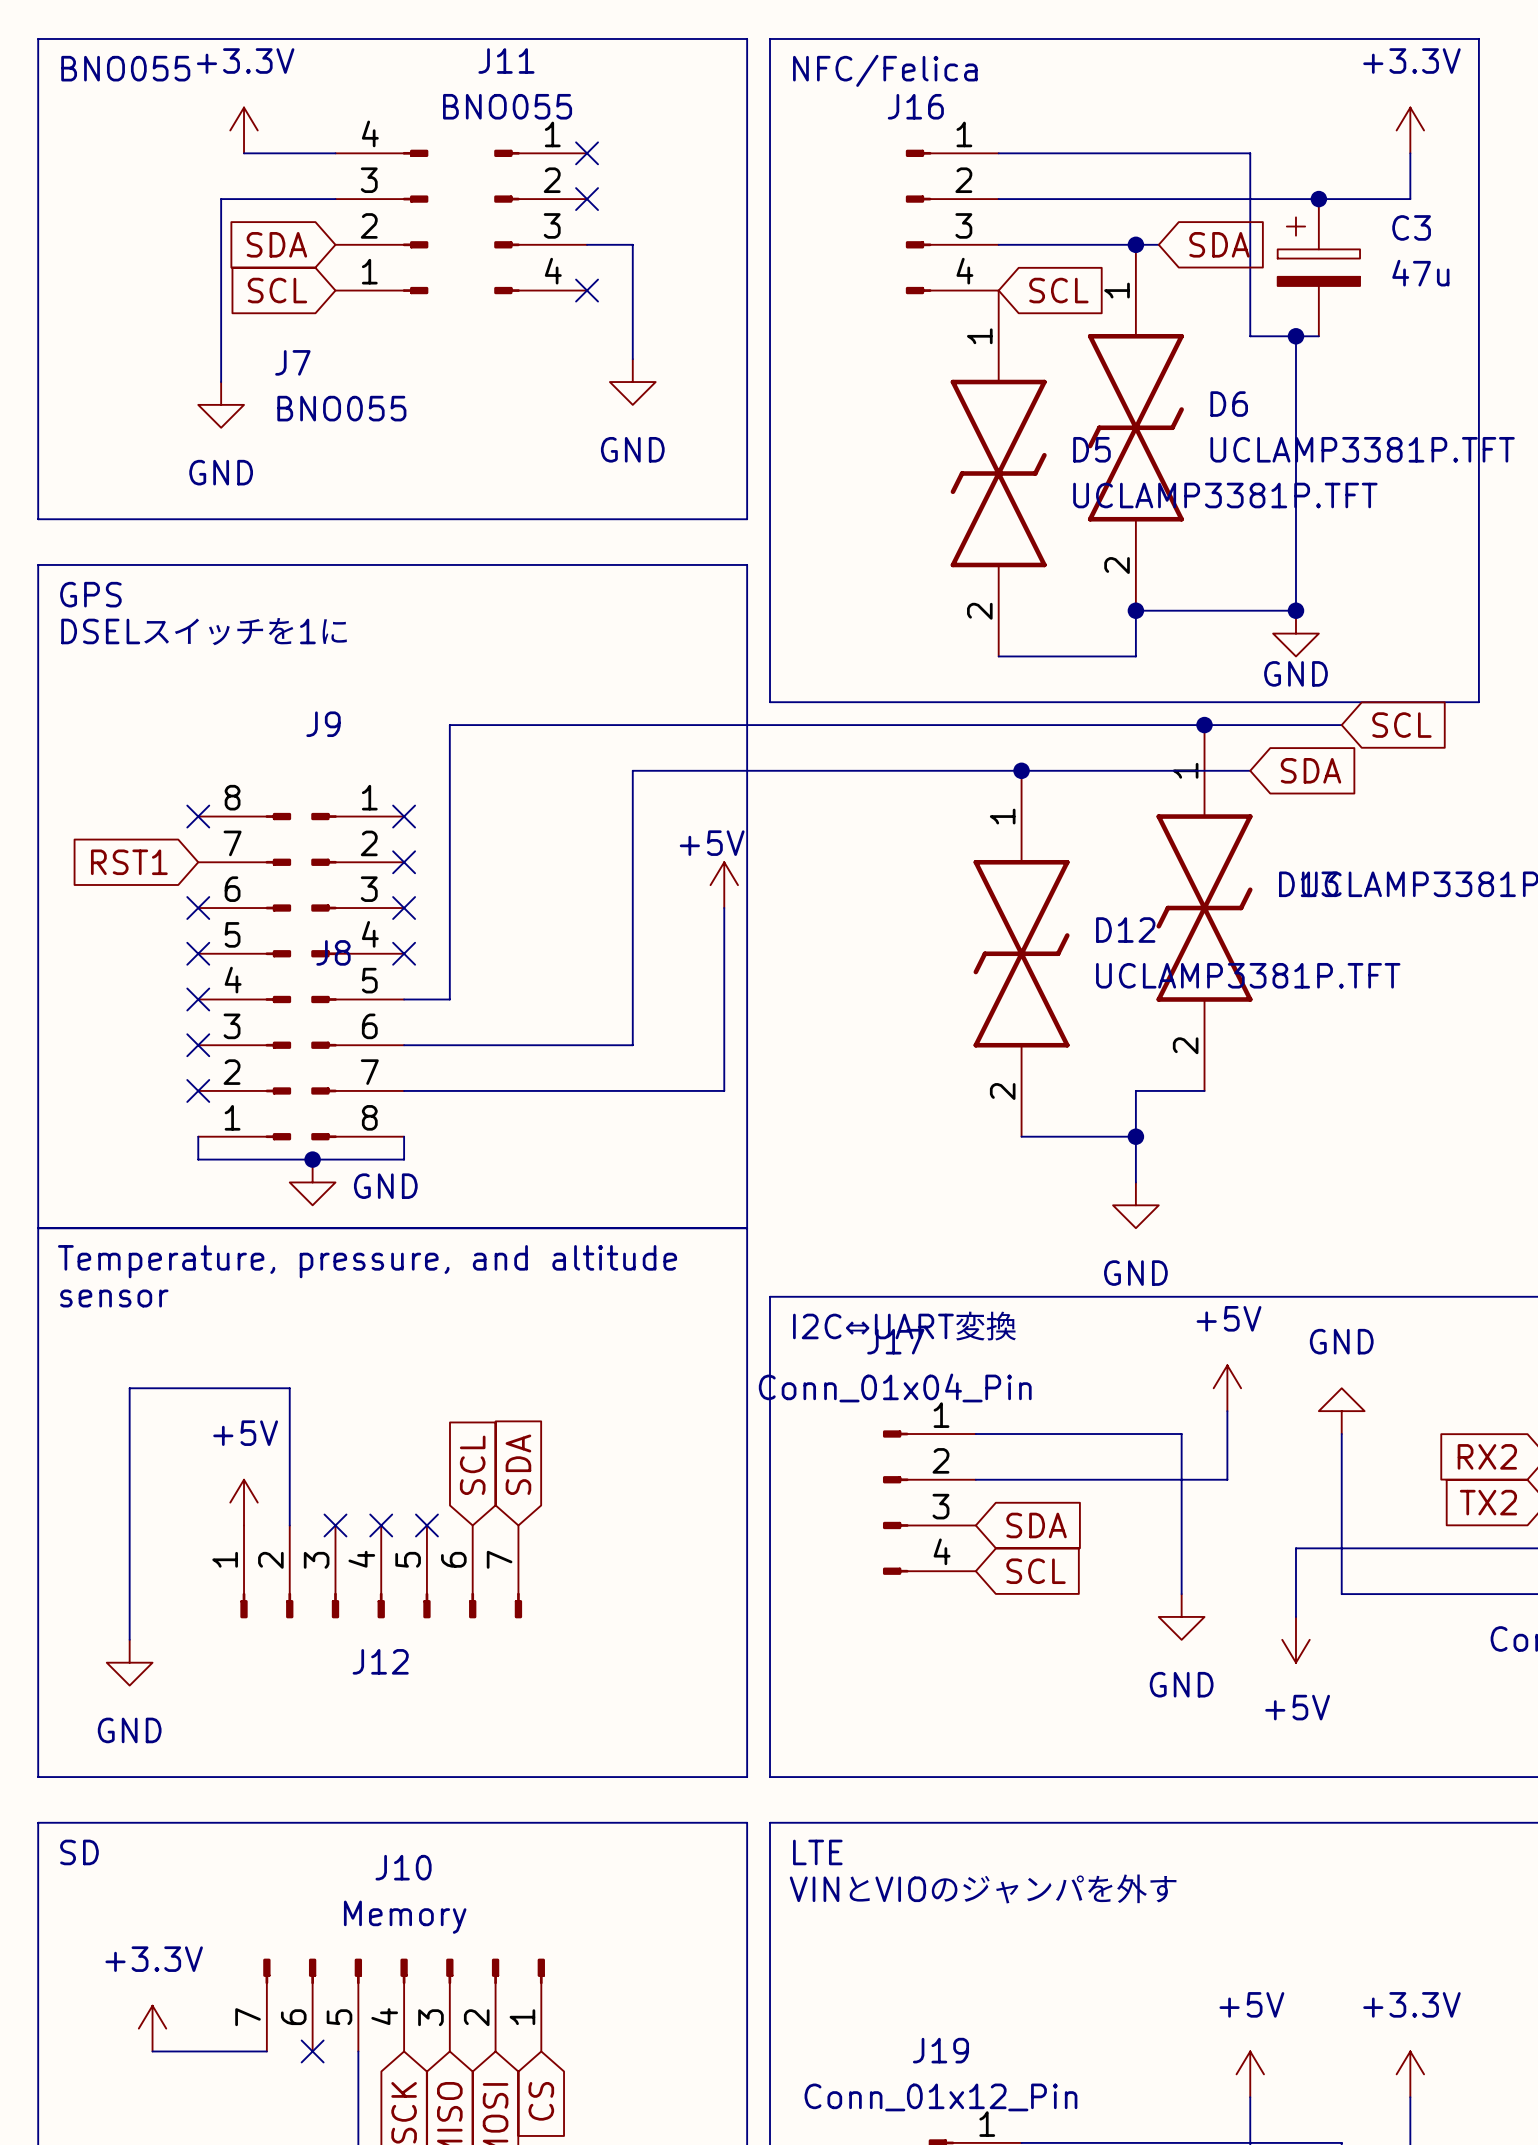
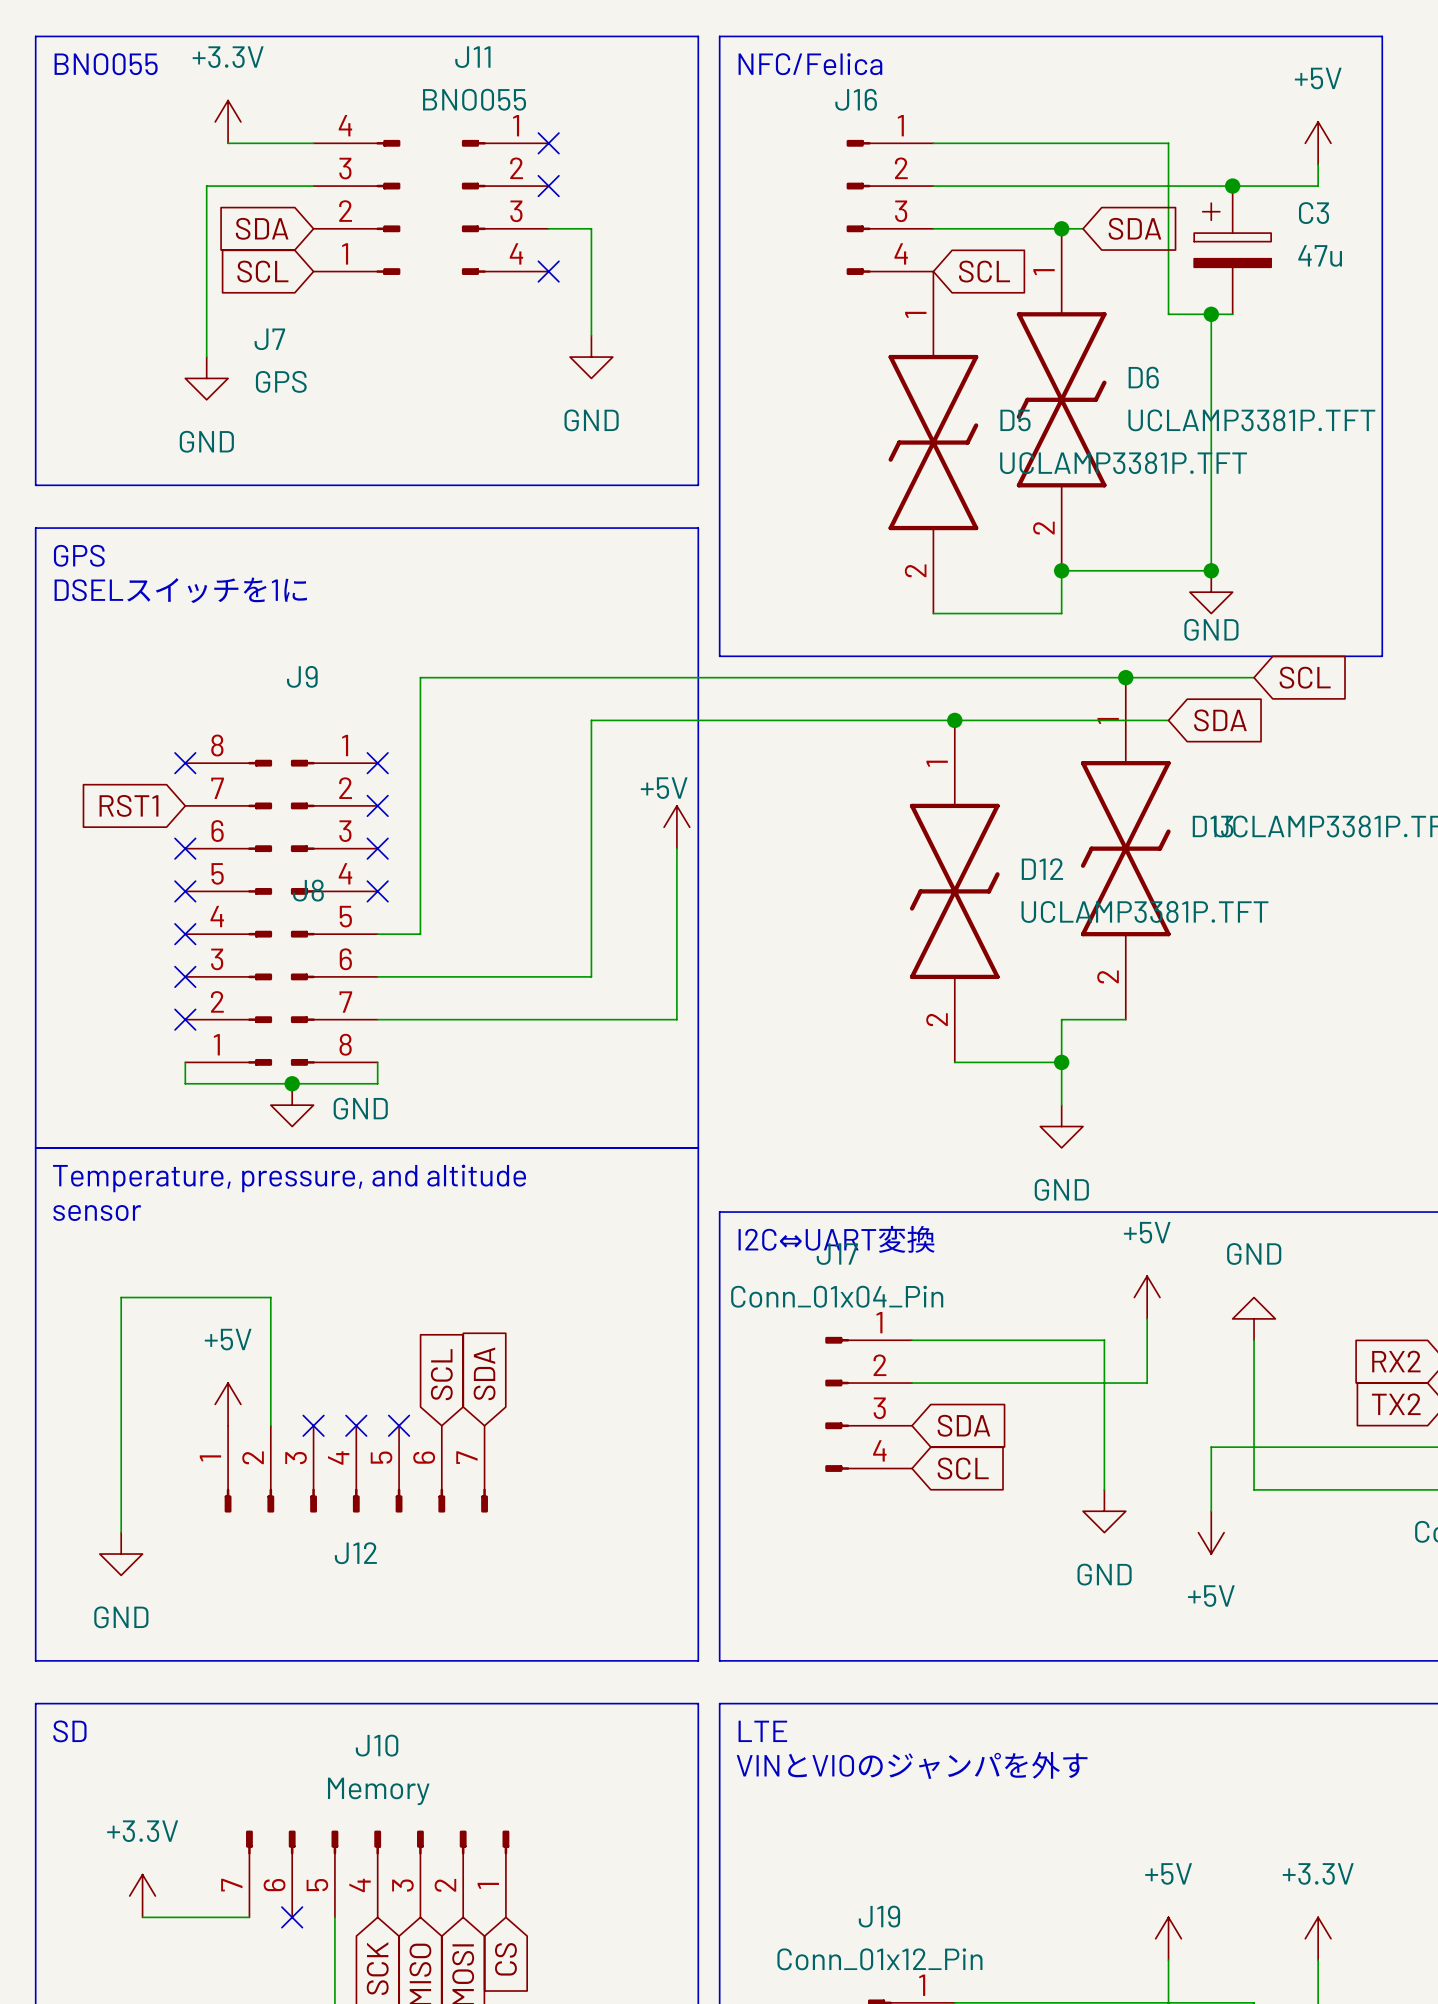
power symbol: +3.3V (1410, 130) -> none
power symbol: none -> +5V (1318, 143)
J7 value: BNO055 (341, 408) -> GPS (281, 381)

